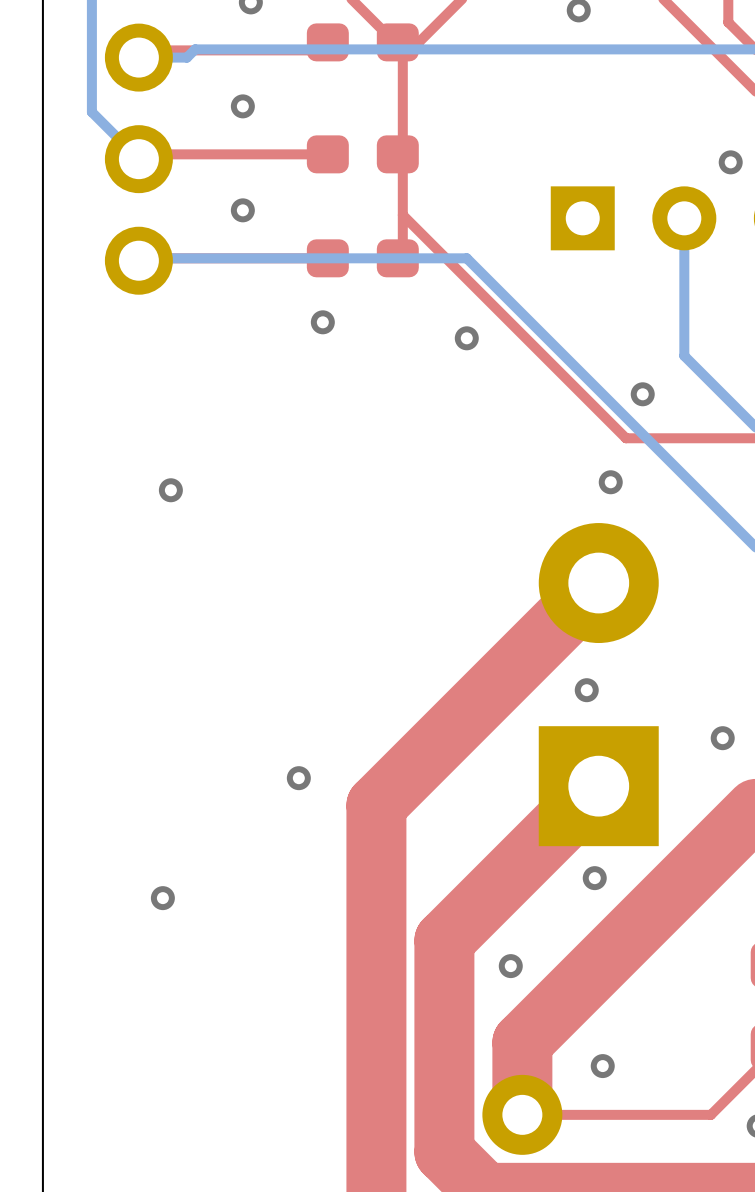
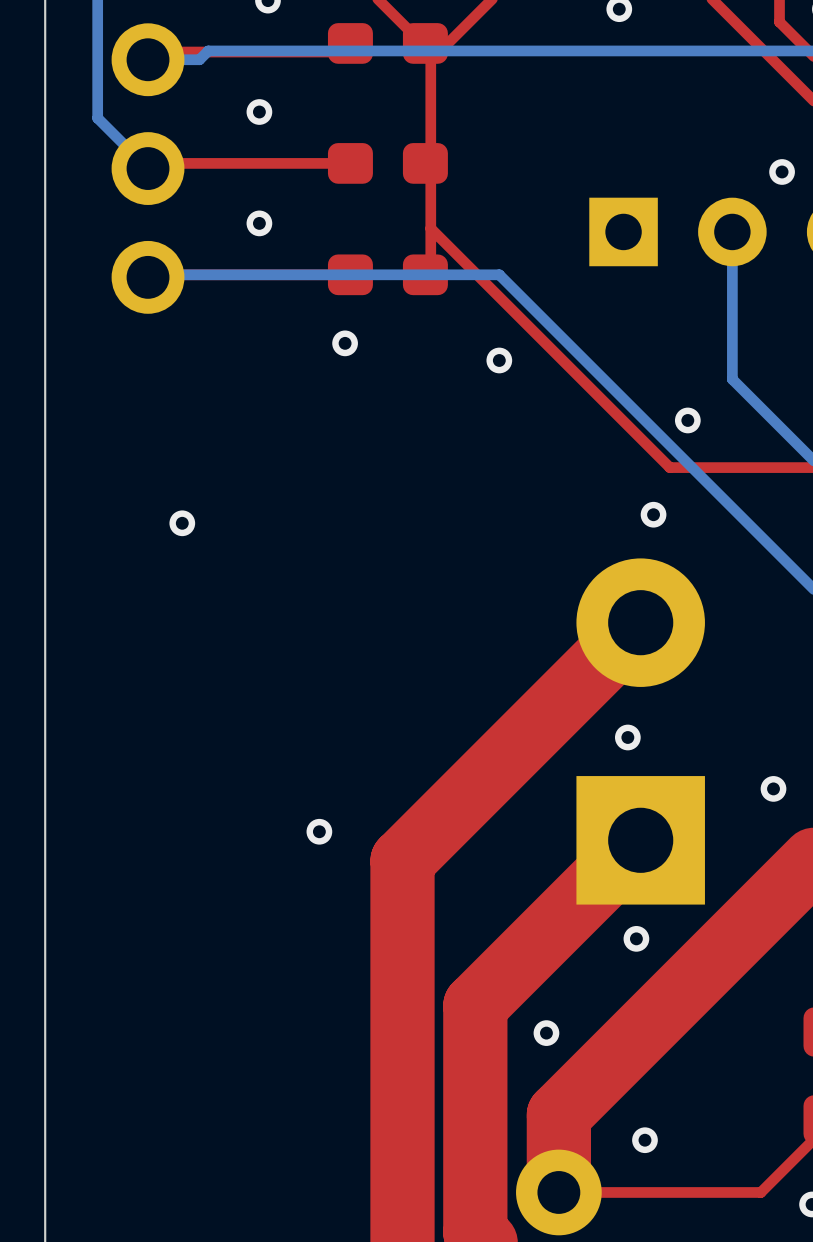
via: (162, 898) -> none

